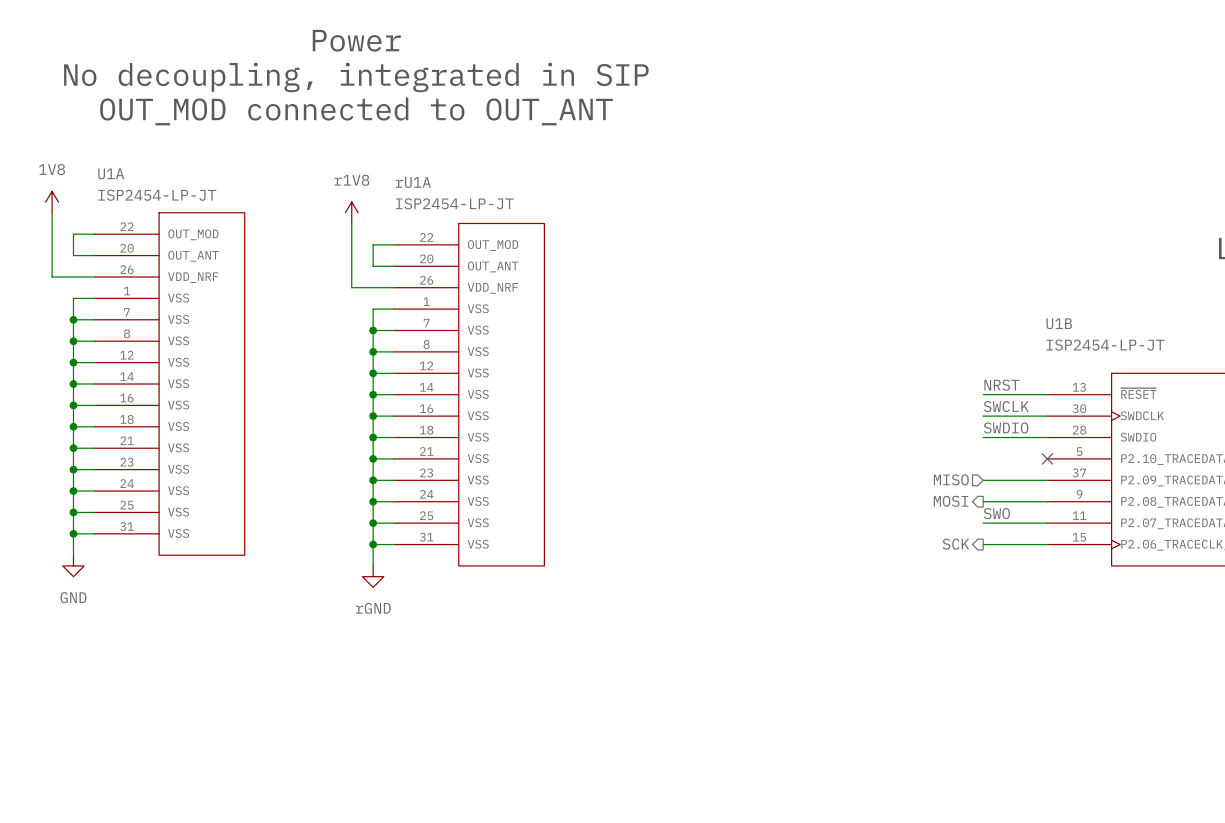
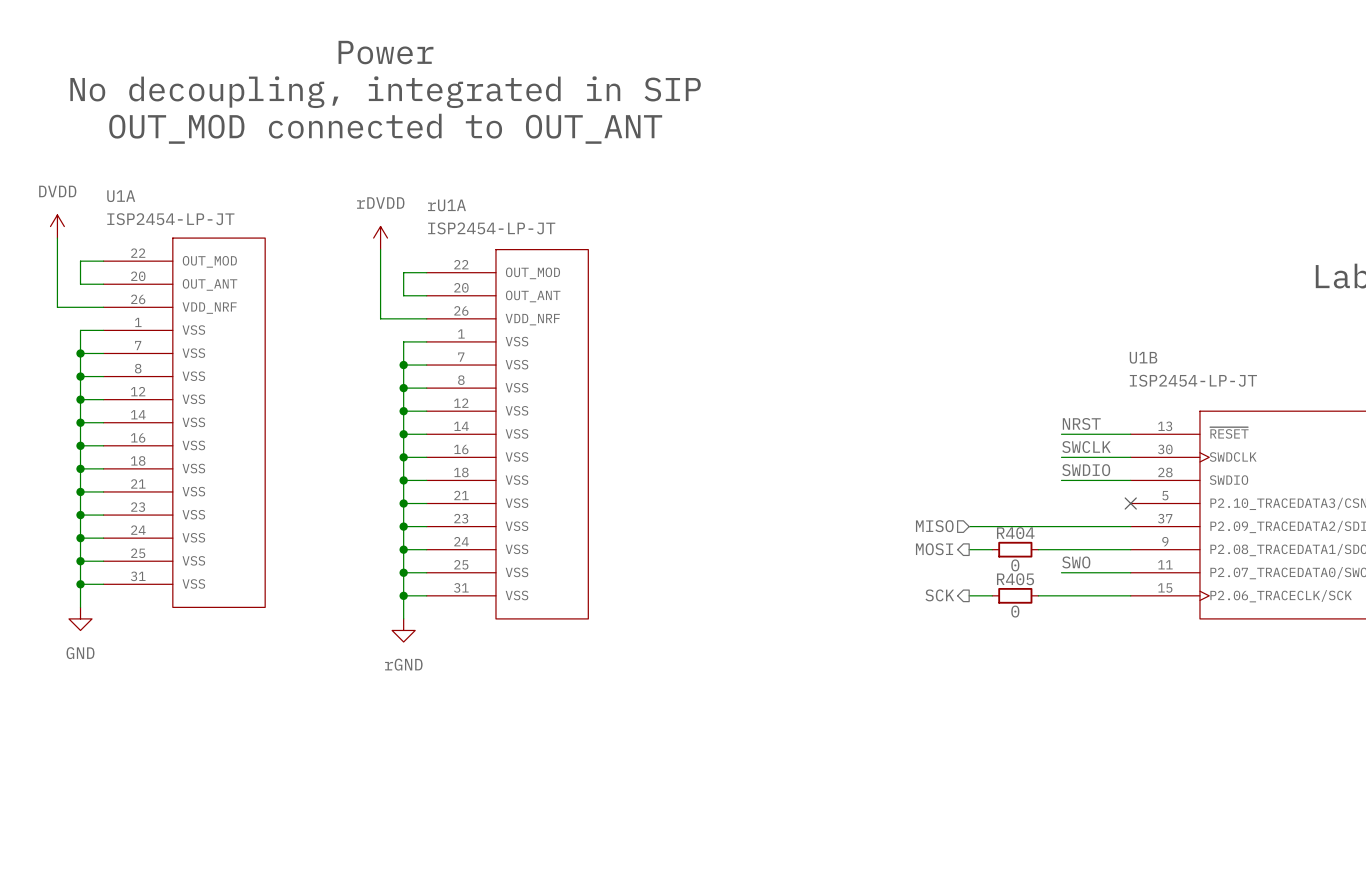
power symbol: 1V8 (52, 202) -> DVDD (57, 226)
power symbol: r1V8 (351, 212) -> rDVDD (380, 238)
hierarchical label position: MISO (951, 479) -> MISO (934, 526)
wire: none -> (969, 526) (1061, 526)
wire: none -> (969, 549) (992, 549)
R404: none -> 0 (1015, 549)
hierarchical label position: MOSI (951, 501) -> MOSI (934, 549)
wire: none -> (1038, 549) (1061, 549)
wire: none -> (969, 595) (992, 595)
R405: none -> 0 (1015, 595)
hierarchical label position: SCK (955, 544) -> SCK (939, 595)
wire: none -> (1038, 595) (1061, 595)

